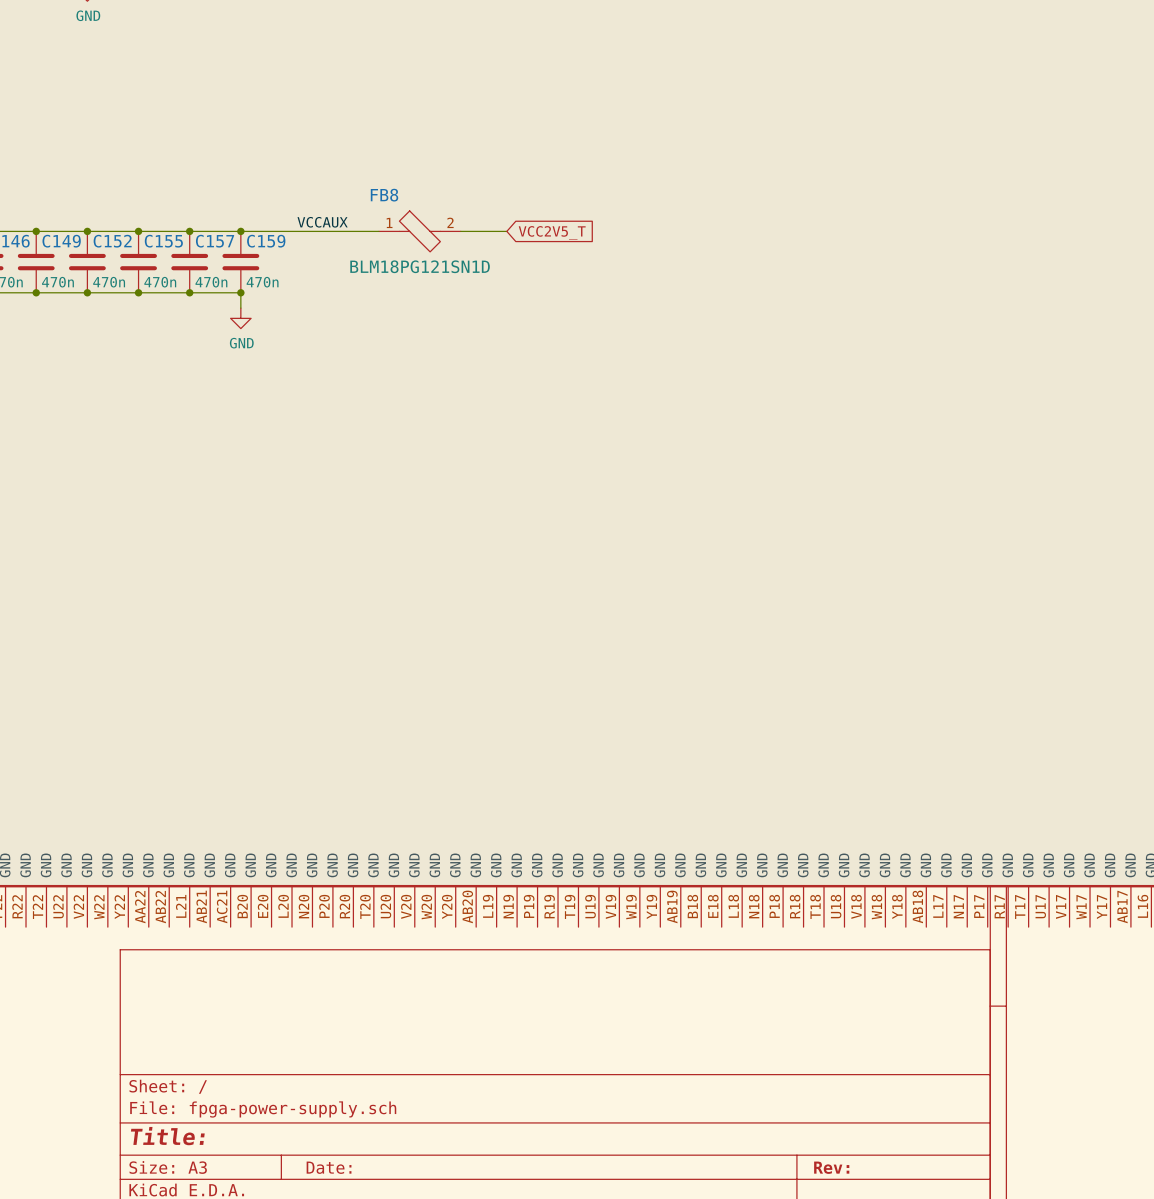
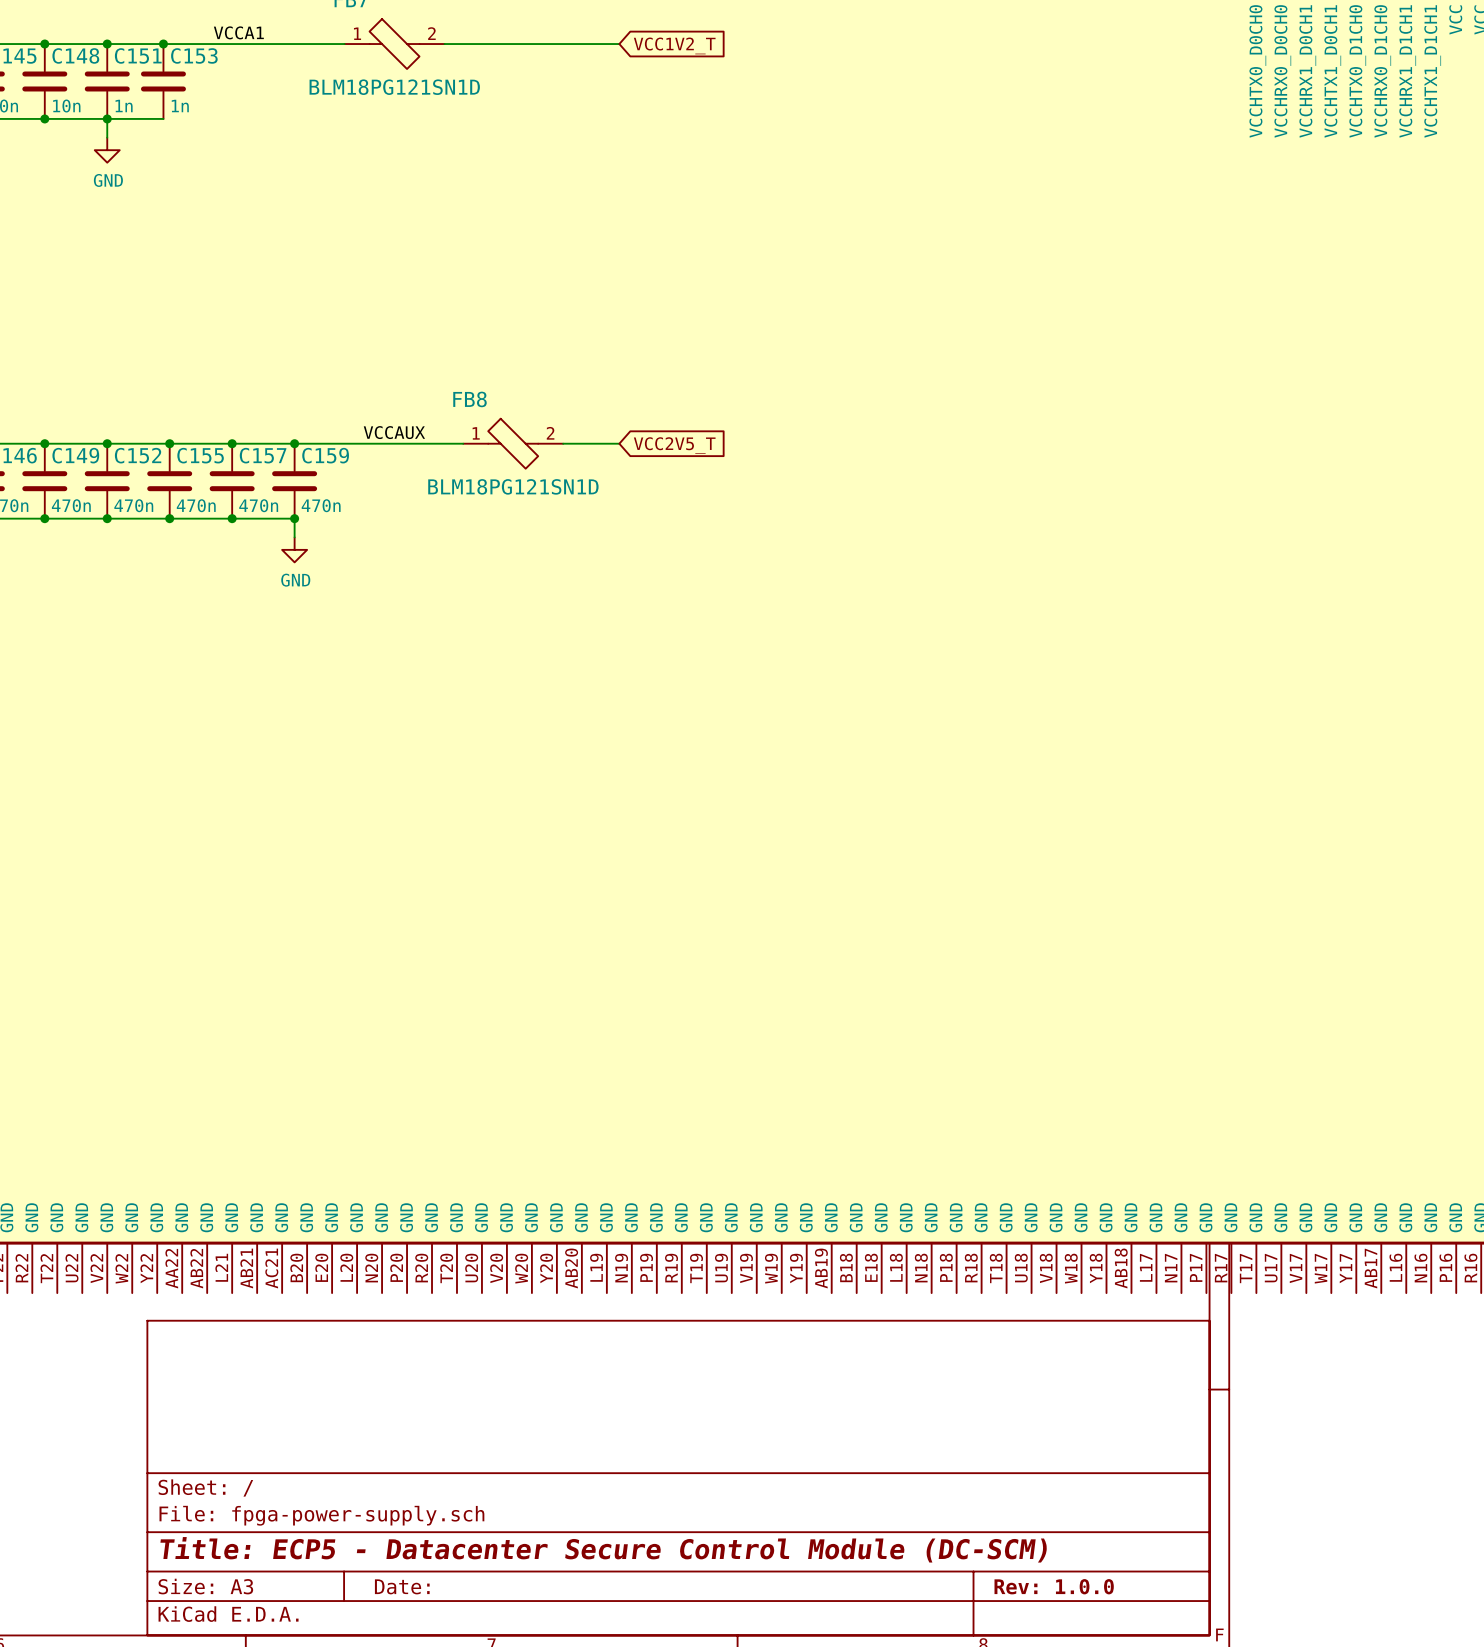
title block: Title: (167, 1136) -> Title: ECP5 - Datacenter Secure Control Module (DC-SCM) (603, 1549)
title block: Rev: (831, 1167) -> Rev: 1.0.0 (1054, 1586)

